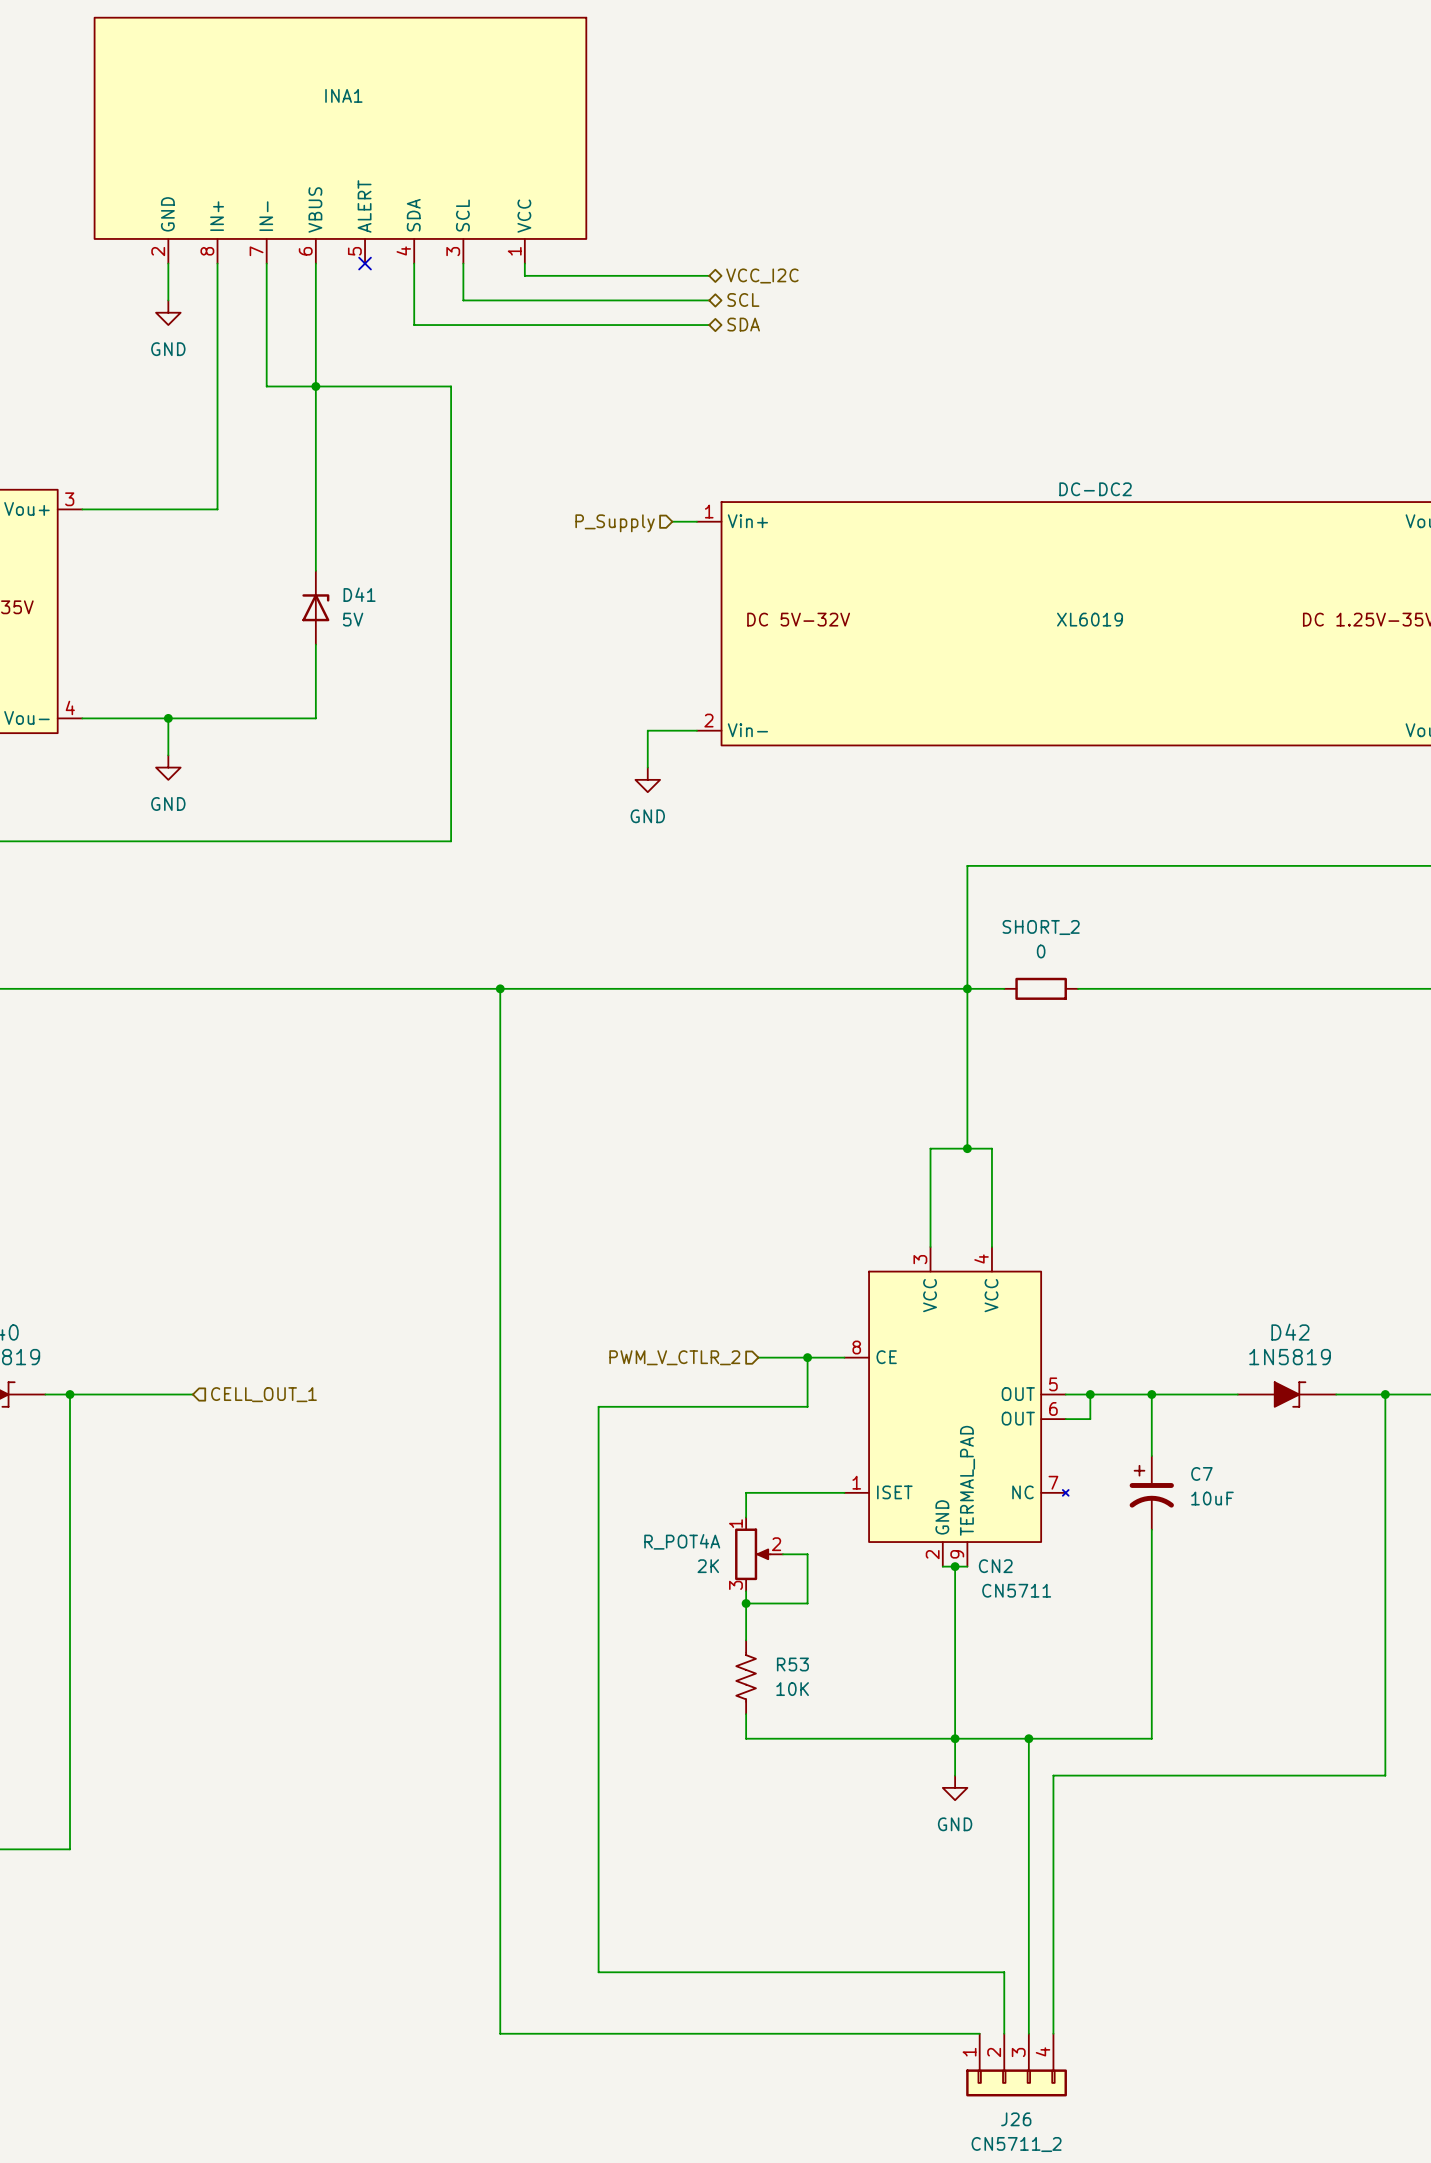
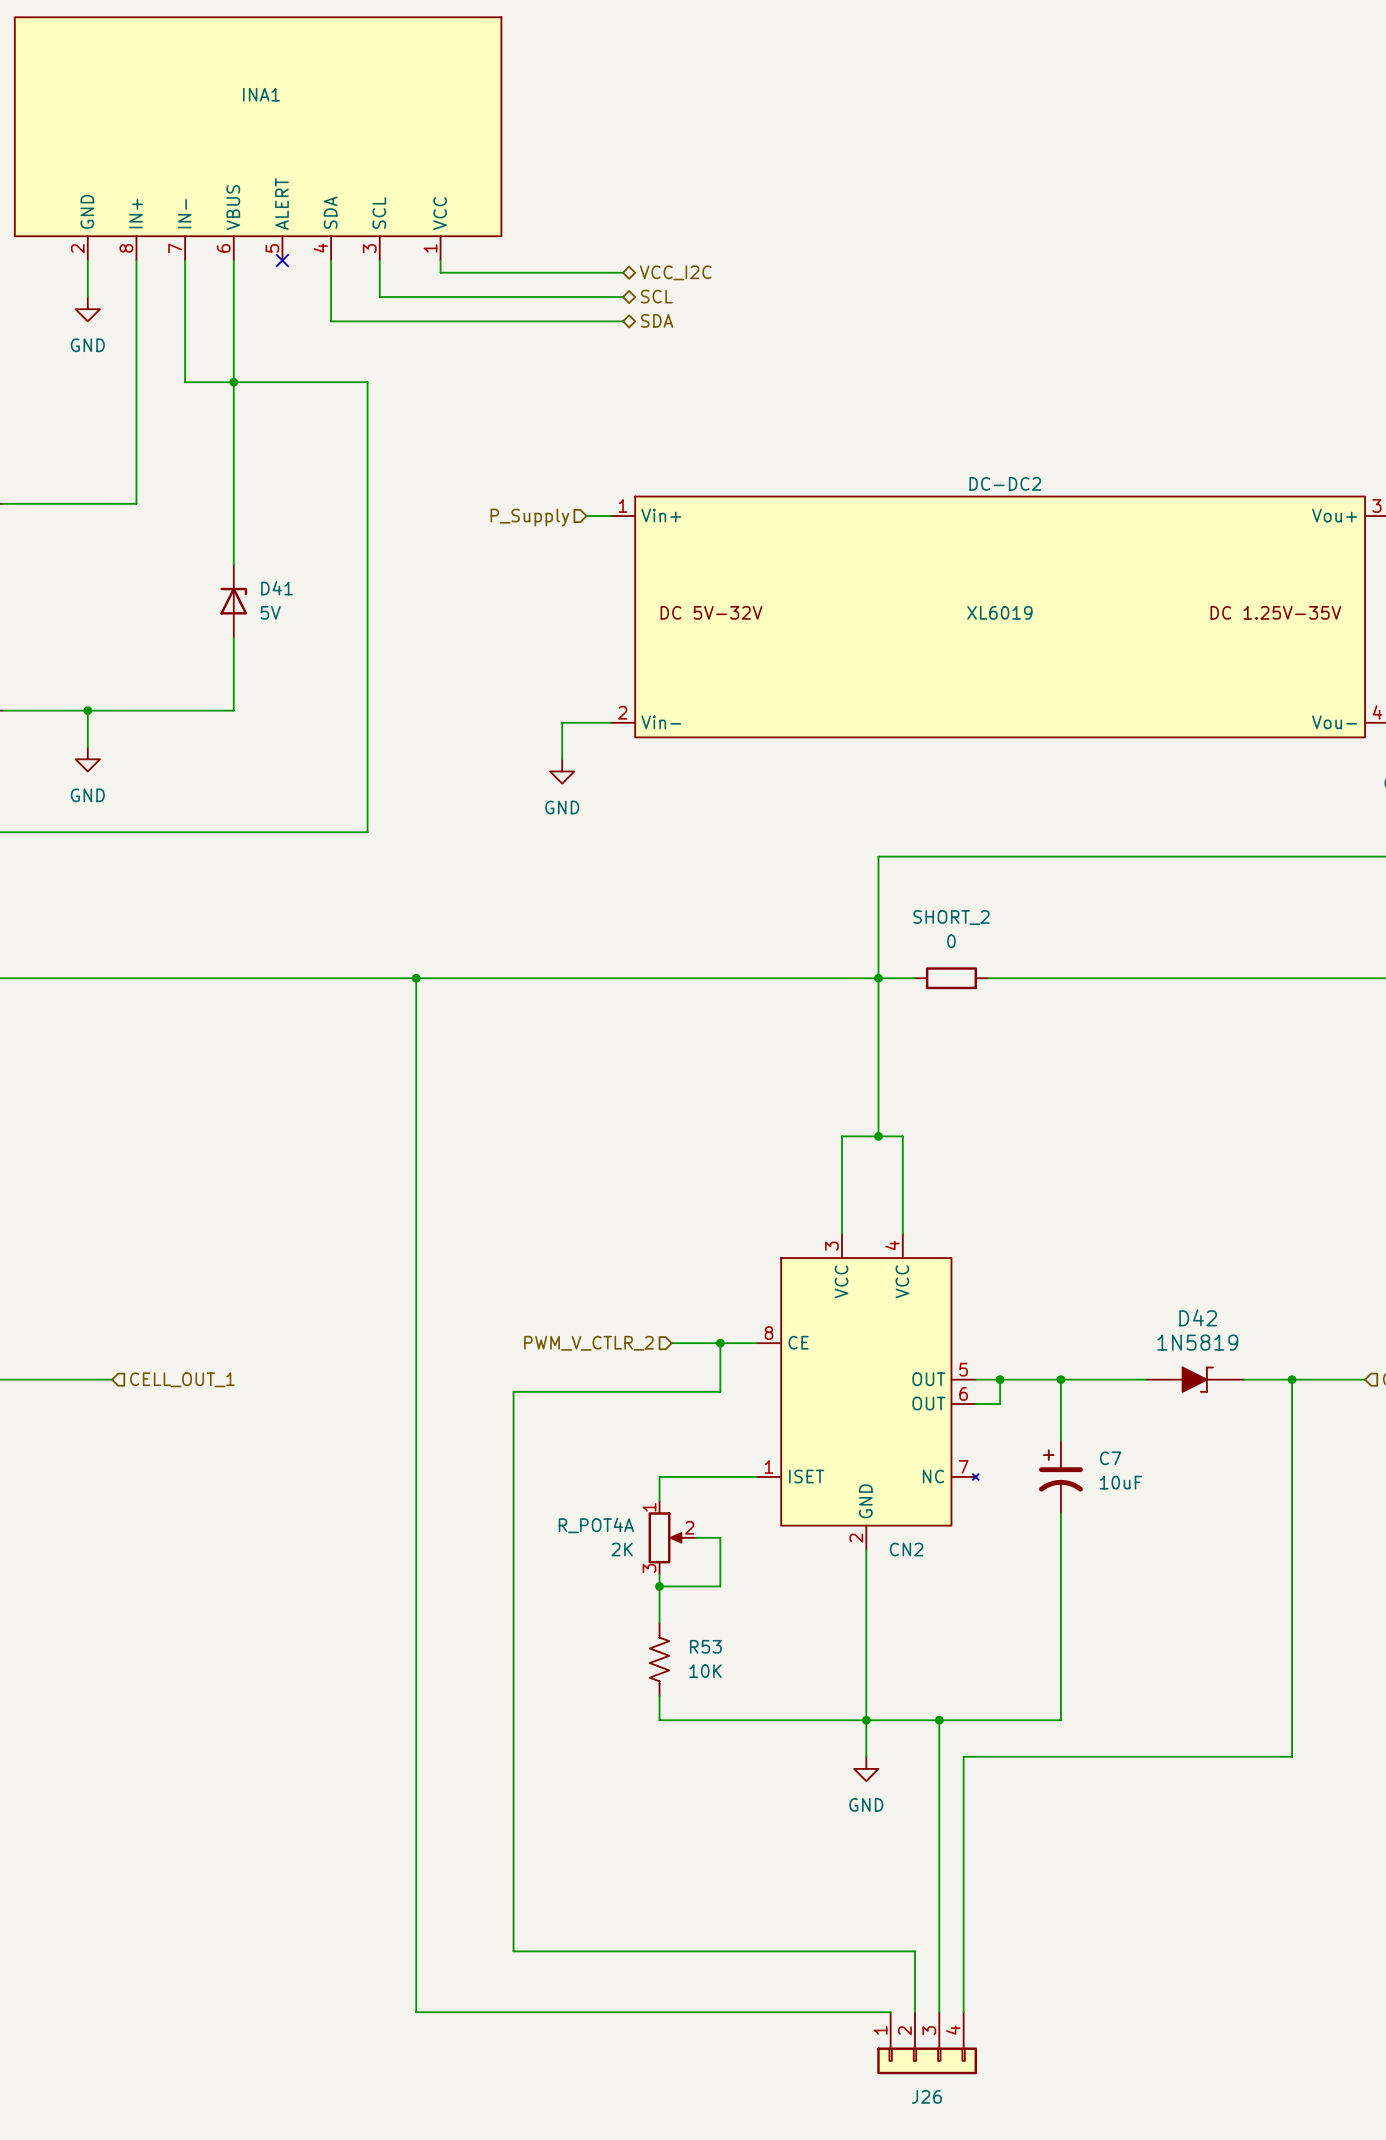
CN2 symbol: [844, 1247, 1069, 1567] -> [756, 1233, 979, 1550]
wire: (942, 1566) (967, 1566) -> none
junction: (955, 1566) -> none
CN2 value: CN5711 (1016, 1590) -> none
J26 value: CN5711_2 (1016, 2144) -> none

